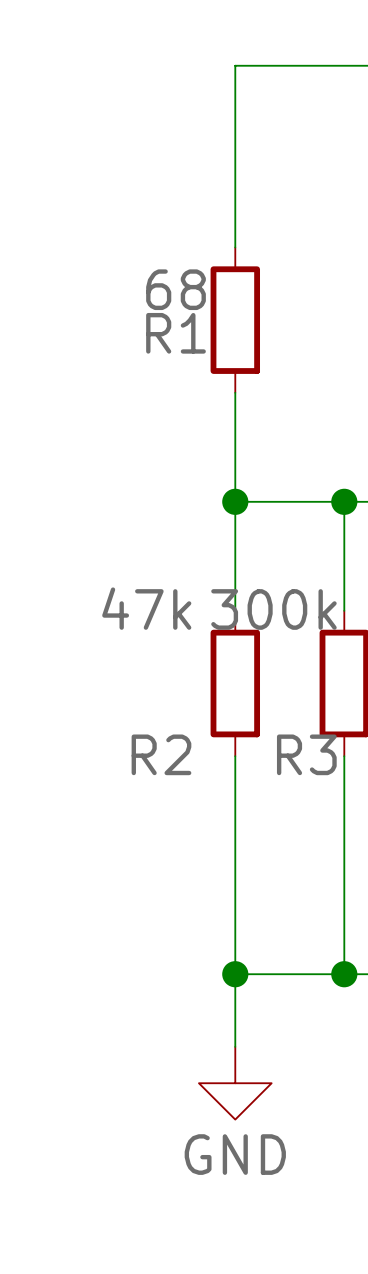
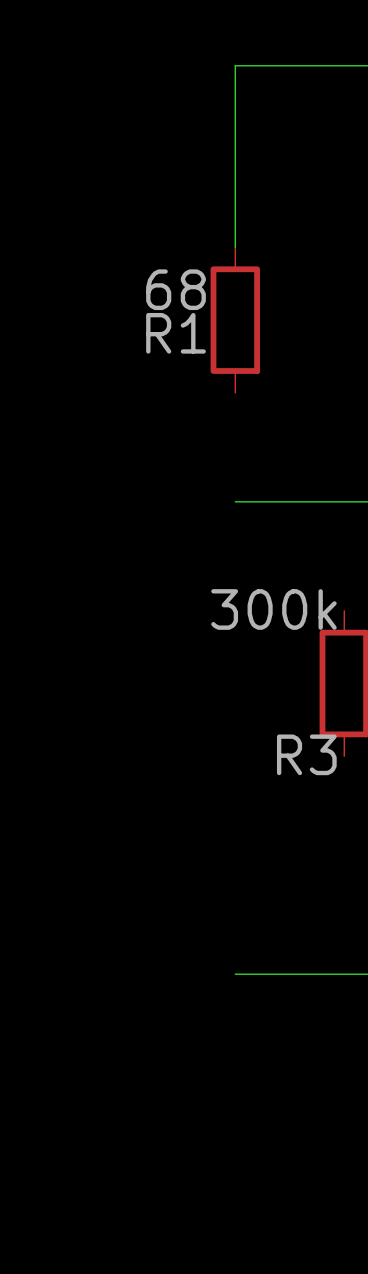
wire: (235, 392) (235, 610) -> none
junction: (235, 501) -> none
wire: (344, 501) (344, 610) -> none
junction: (344, 501) -> none
R2: 47k (235, 683) -> none
wire: (235, 756) (235, 1046) -> none
wire: (344, 756) (344, 974) -> none
junction: (235, 974) -> none
junction: (344, 974) -> none
power symbol: GND (235, 1083) -> none

